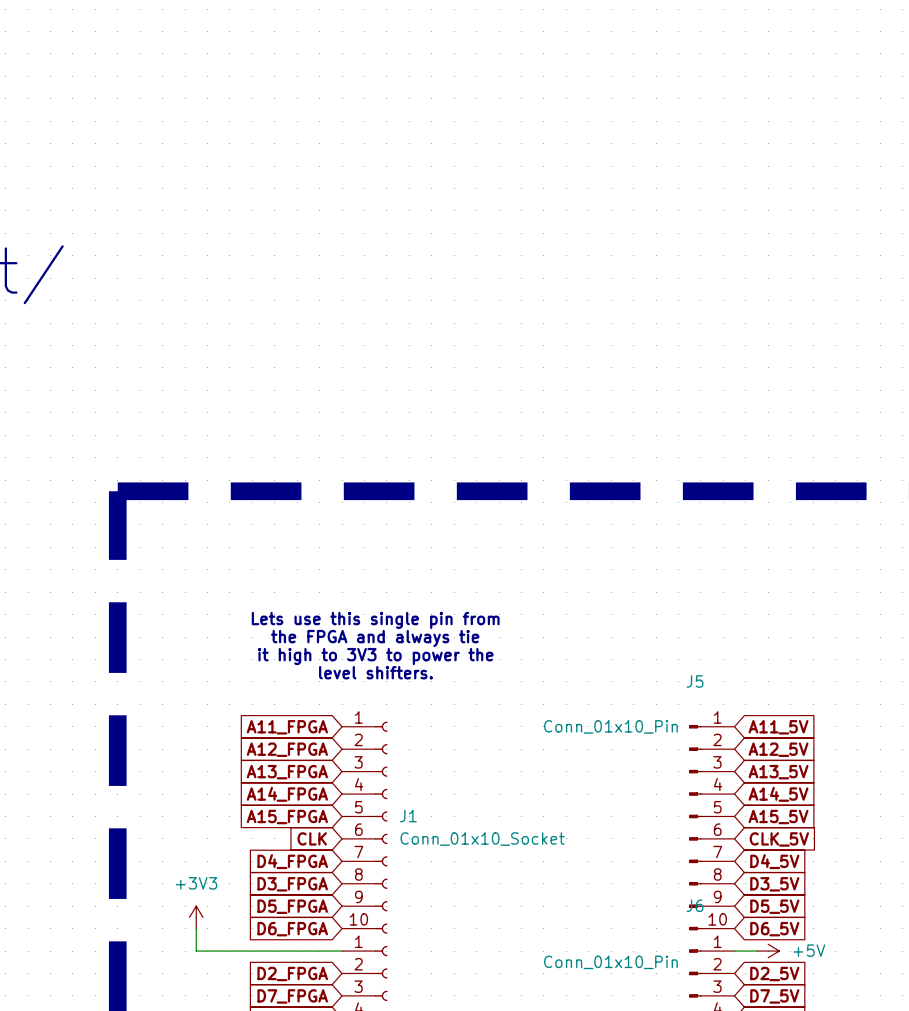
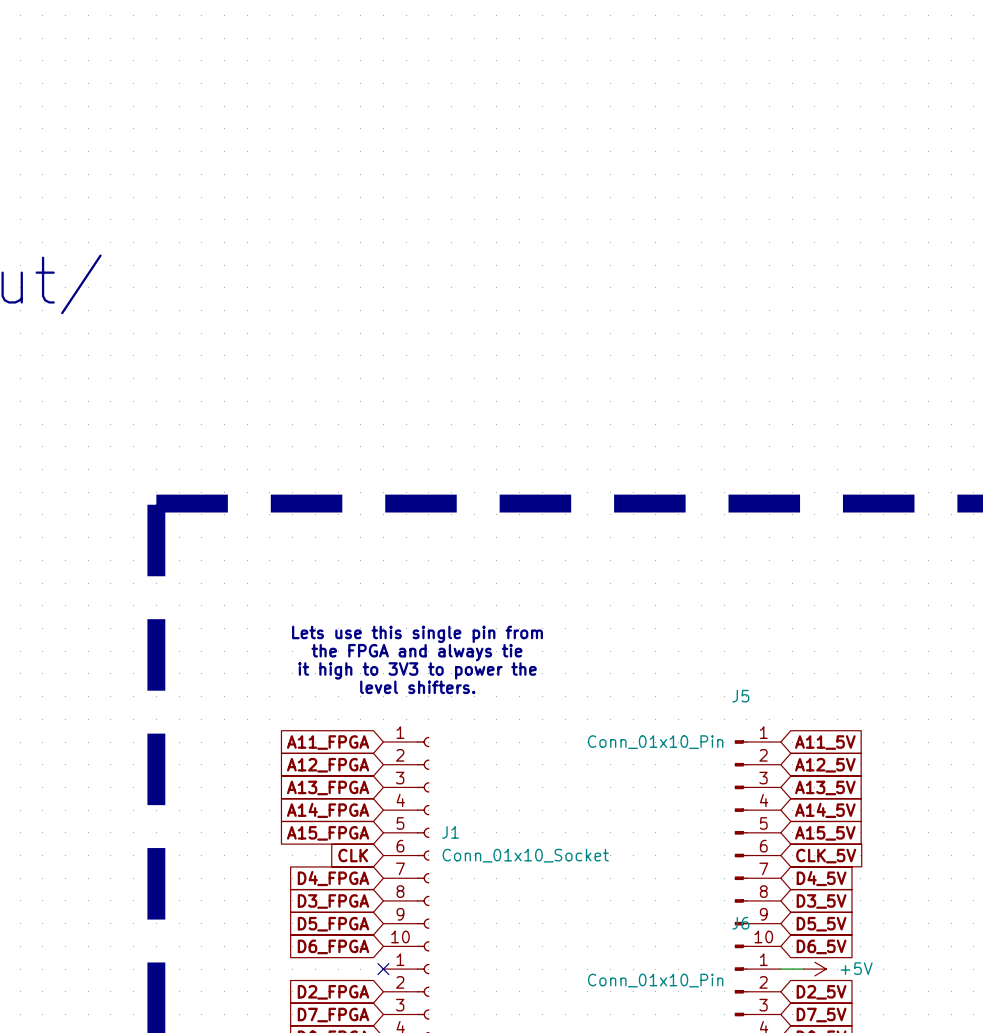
power symbol: +3V3 (196, 917) -> none
wire: (196, 928) (196, 951) (342, 951) -> none
no-connect mark: none -> (383, 969)

